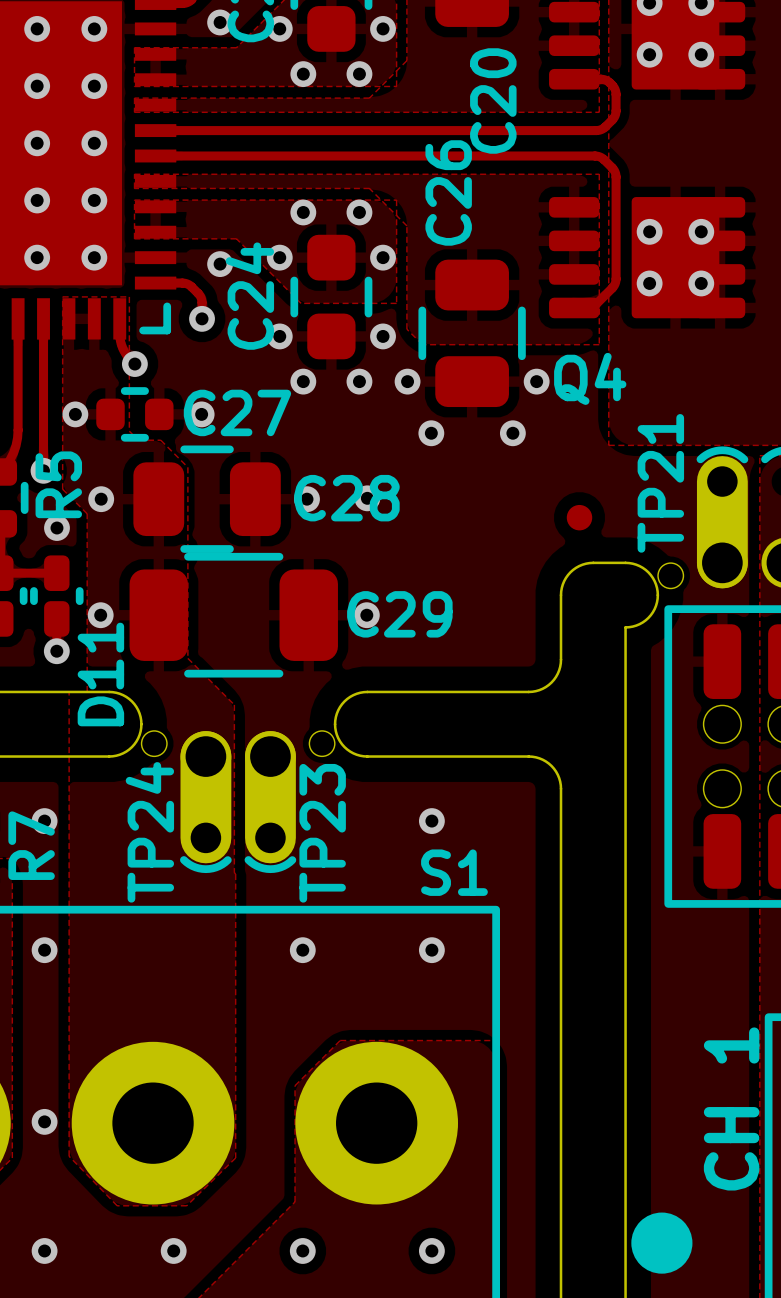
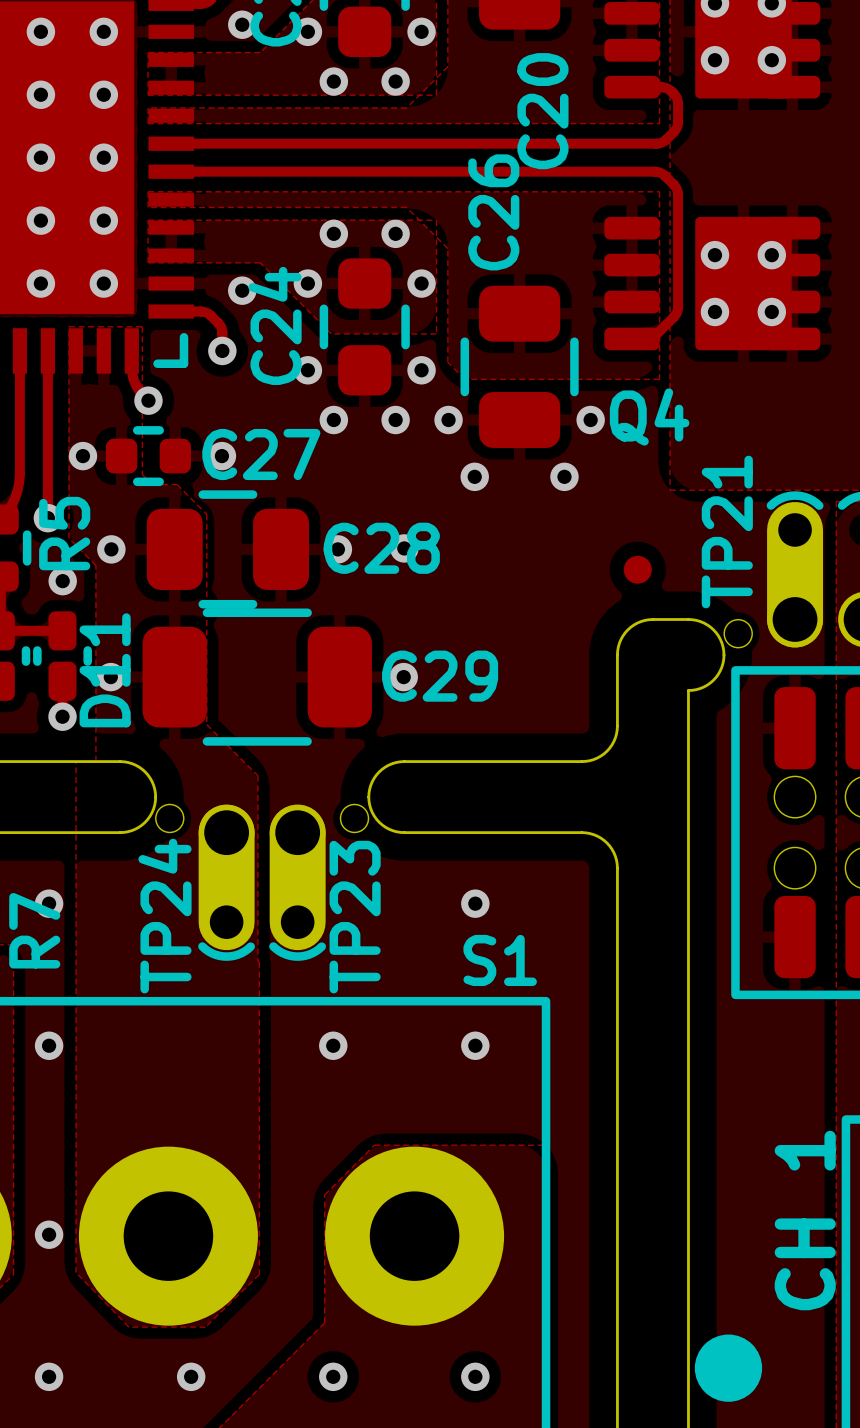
D11 name position: D11 (100, 674) -> D11 (105, 670)

